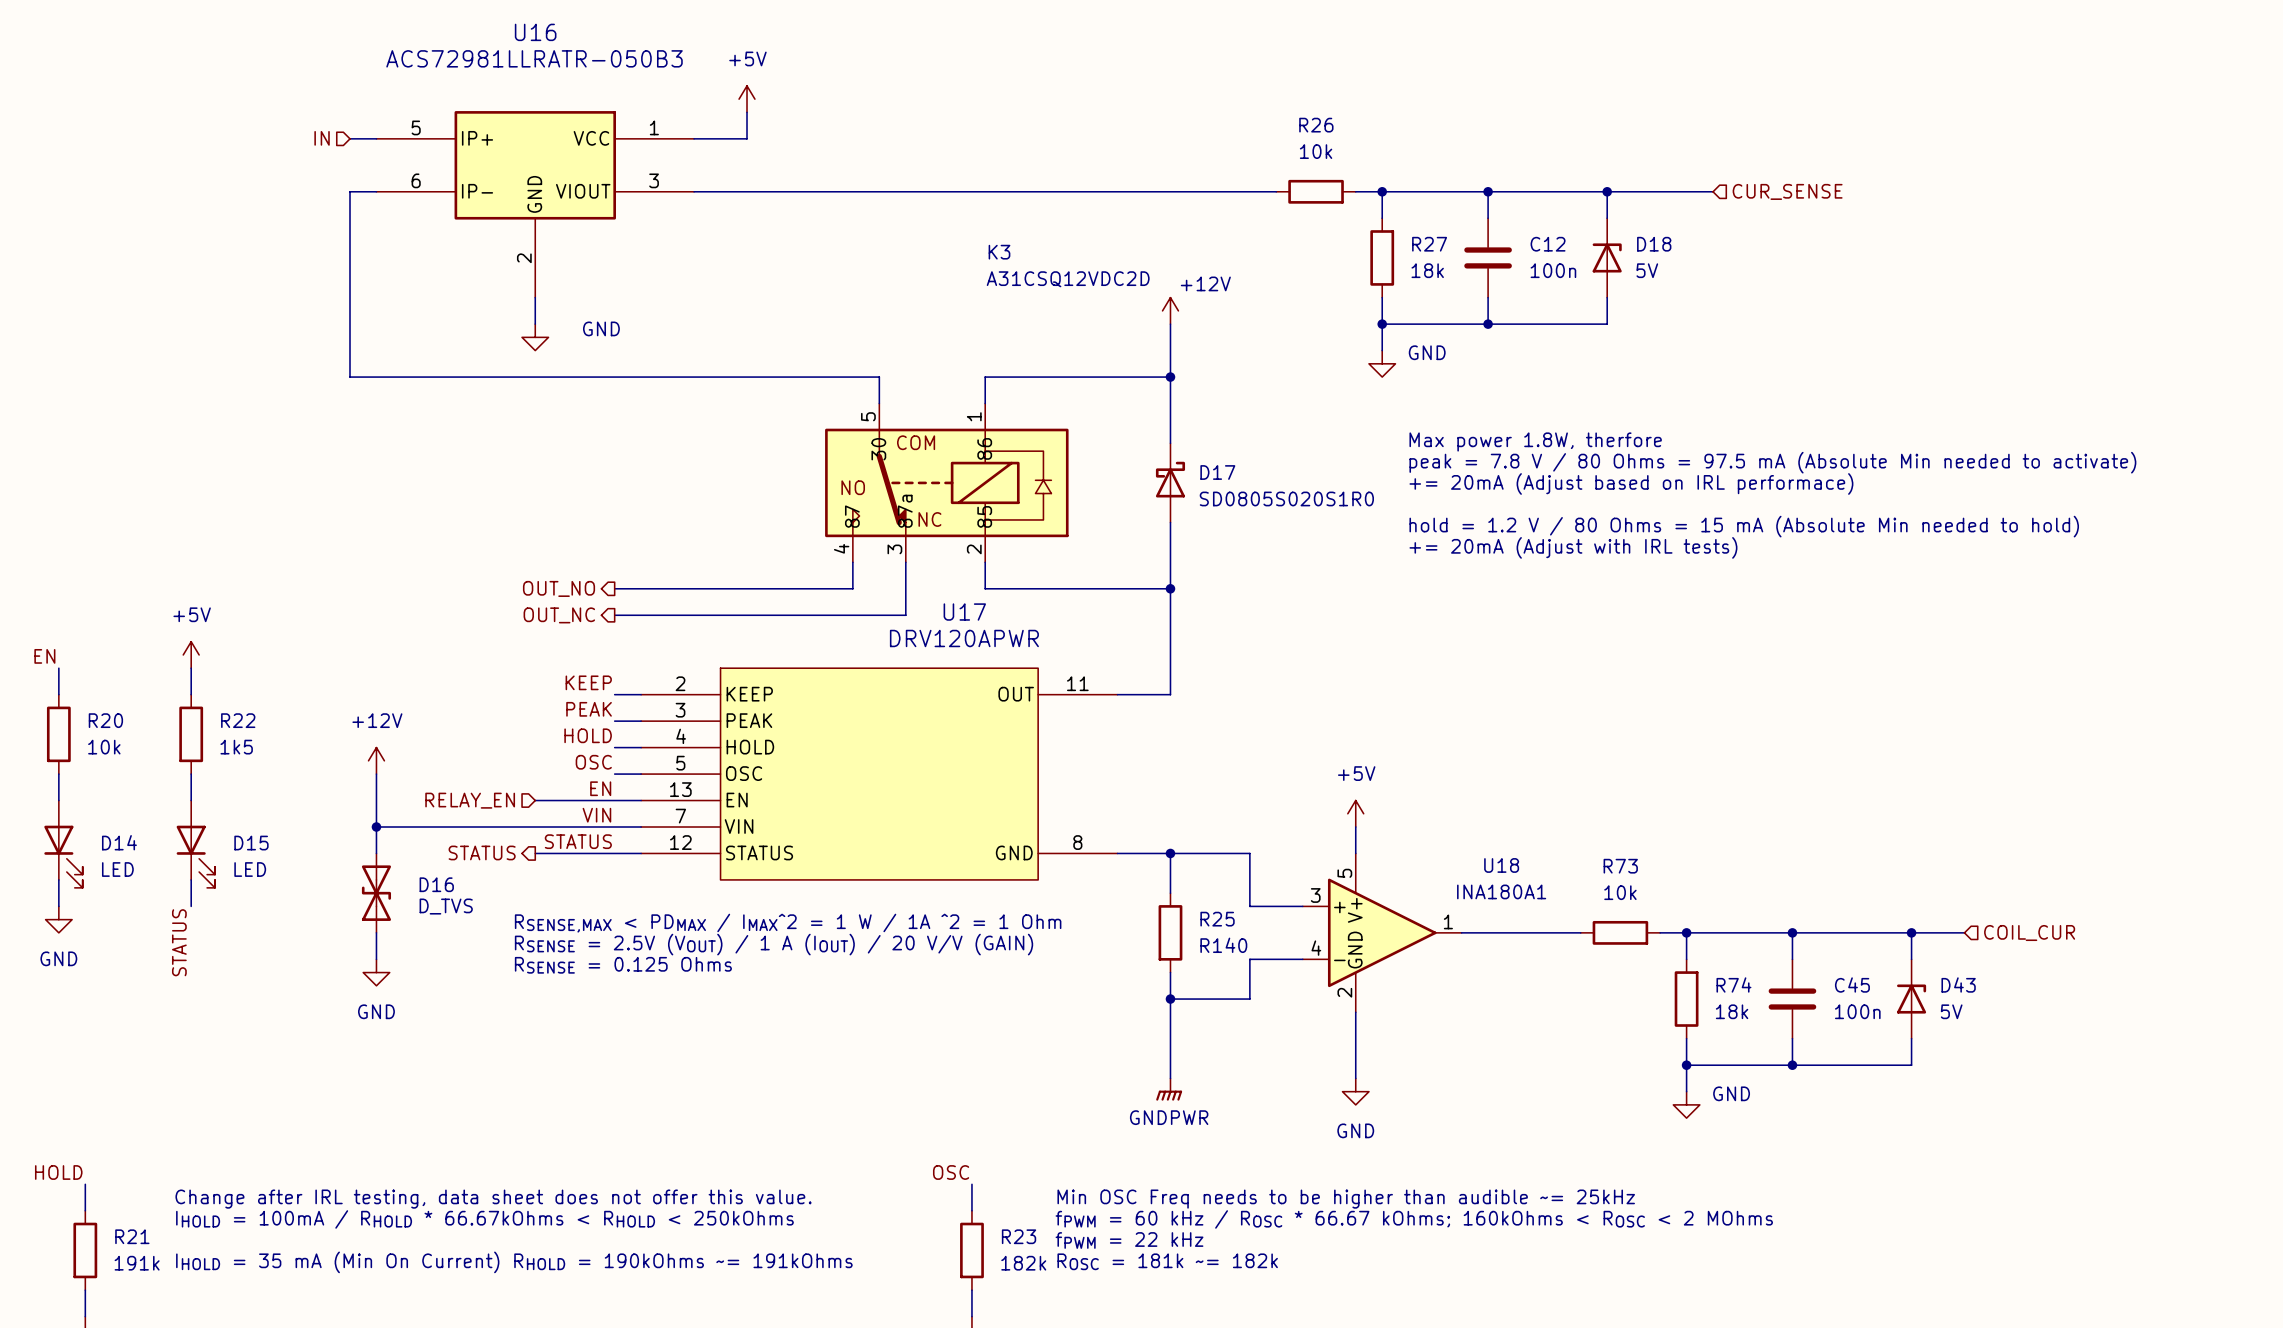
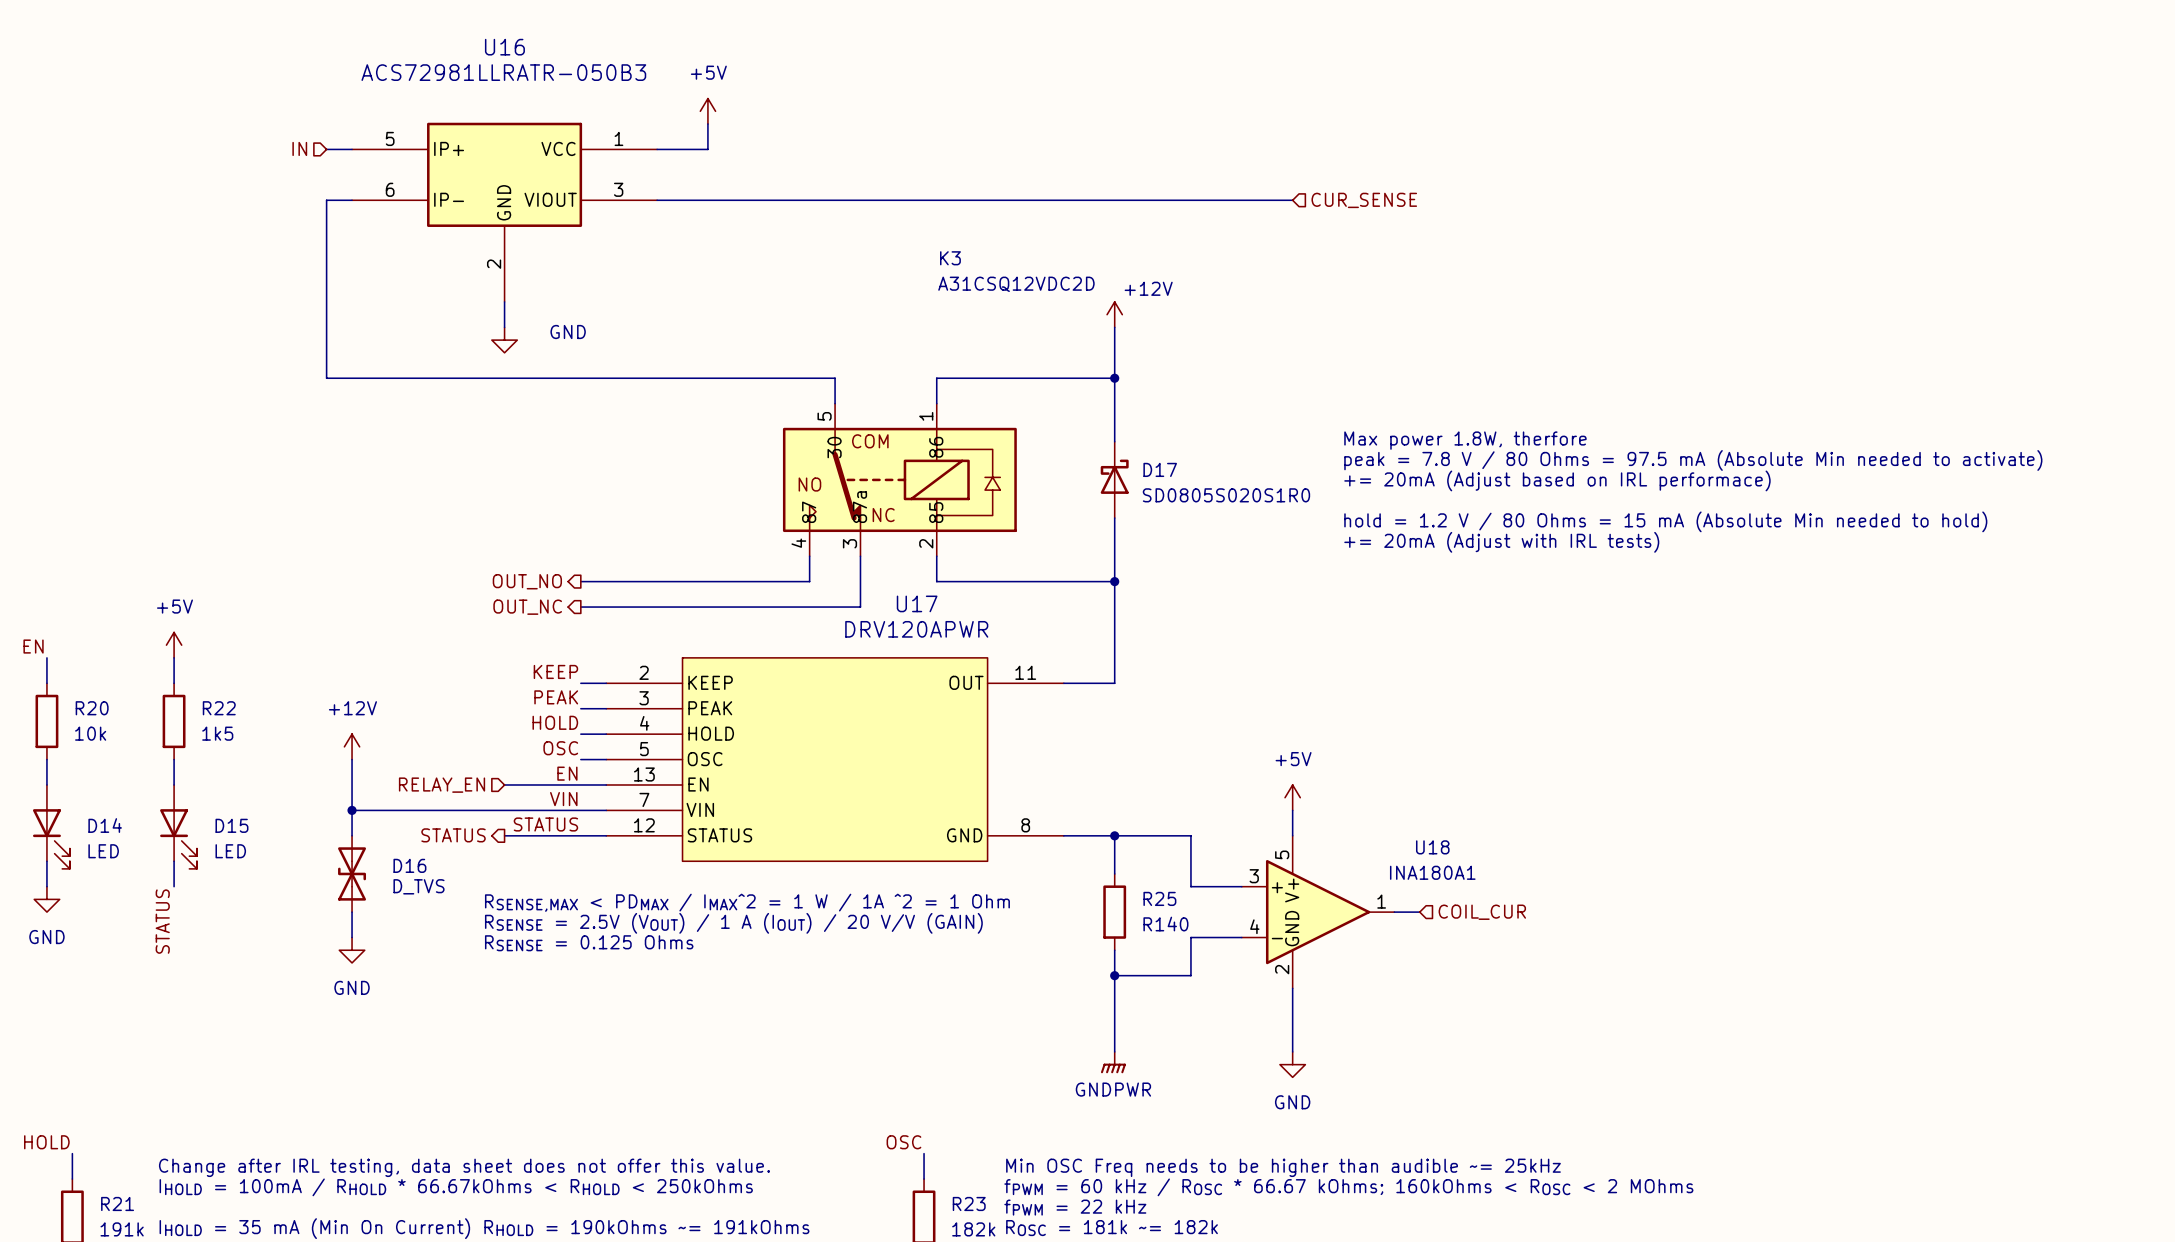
R26: 10k (1316, 191) -> none
wire: (1355, 191) (1713, 191) -> (1292, 200) (1216, 200)
wire: (1382, 191) (1382, 218) -> none
junction: (1382, 191) -> none
hierarchical label: none -> CUR_SENSE (1364, 200)
wire: (1488, 191) (1488, 218) -> none
junction: (1488, 191) -> none
wire: (1607, 191) (1607, 218) -> none
junction: (1607, 191) -> none
hierarchical label: CUR_SENSE (1787, 191) -> none
R27: 18k (1382, 257) -> none
C12: 100n (1488, 257) -> none
D18: 5V (1607, 257) -> none
wire: (1382, 297) (1382, 350) -> none
wire: (1488, 297) (1488, 324) -> none
wire: (1607, 297) (1607, 324) (1382, 324) -> none
junction: (1382, 324) -> none
junction: (1488, 324) -> none
power symbol: GND (1382, 363) -> none
wire: (1488, 932) (1580, 932) -> none
R73: 10k (1620, 932) -> none
wire: (1660, 932) (1964, 932) -> none
wire: (1686, 932) (1686, 959) -> none
junction: (1686, 932) -> none
wire: (1792, 932) (1792, 959) -> none
junction: (1792, 932) -> none
wire: (1911, 932) (1911, 959) -> none
junction: (1911, 932) -> none
hierarchical label: none -> COIL_CUR (1482, 912)
hierarchical label: COIL_CUR (2029, 933) -> none
R74: 18k (1686, 999) -> none
C45: 100n (1792, 999) -> none
D43: 5V (1911, 999) -> none
wire: (1686, 1038) (1686, 1091) -> none
wire: (1792, 1038) (1792, 1065) -> none
wire: (1911, 1038) (1911, 1065) (1686, 1065) -> none
junction: (1686, 1065) -> none
junction: (1792, 1065) -> none
power symbol: GND (1686, 1104) -> none

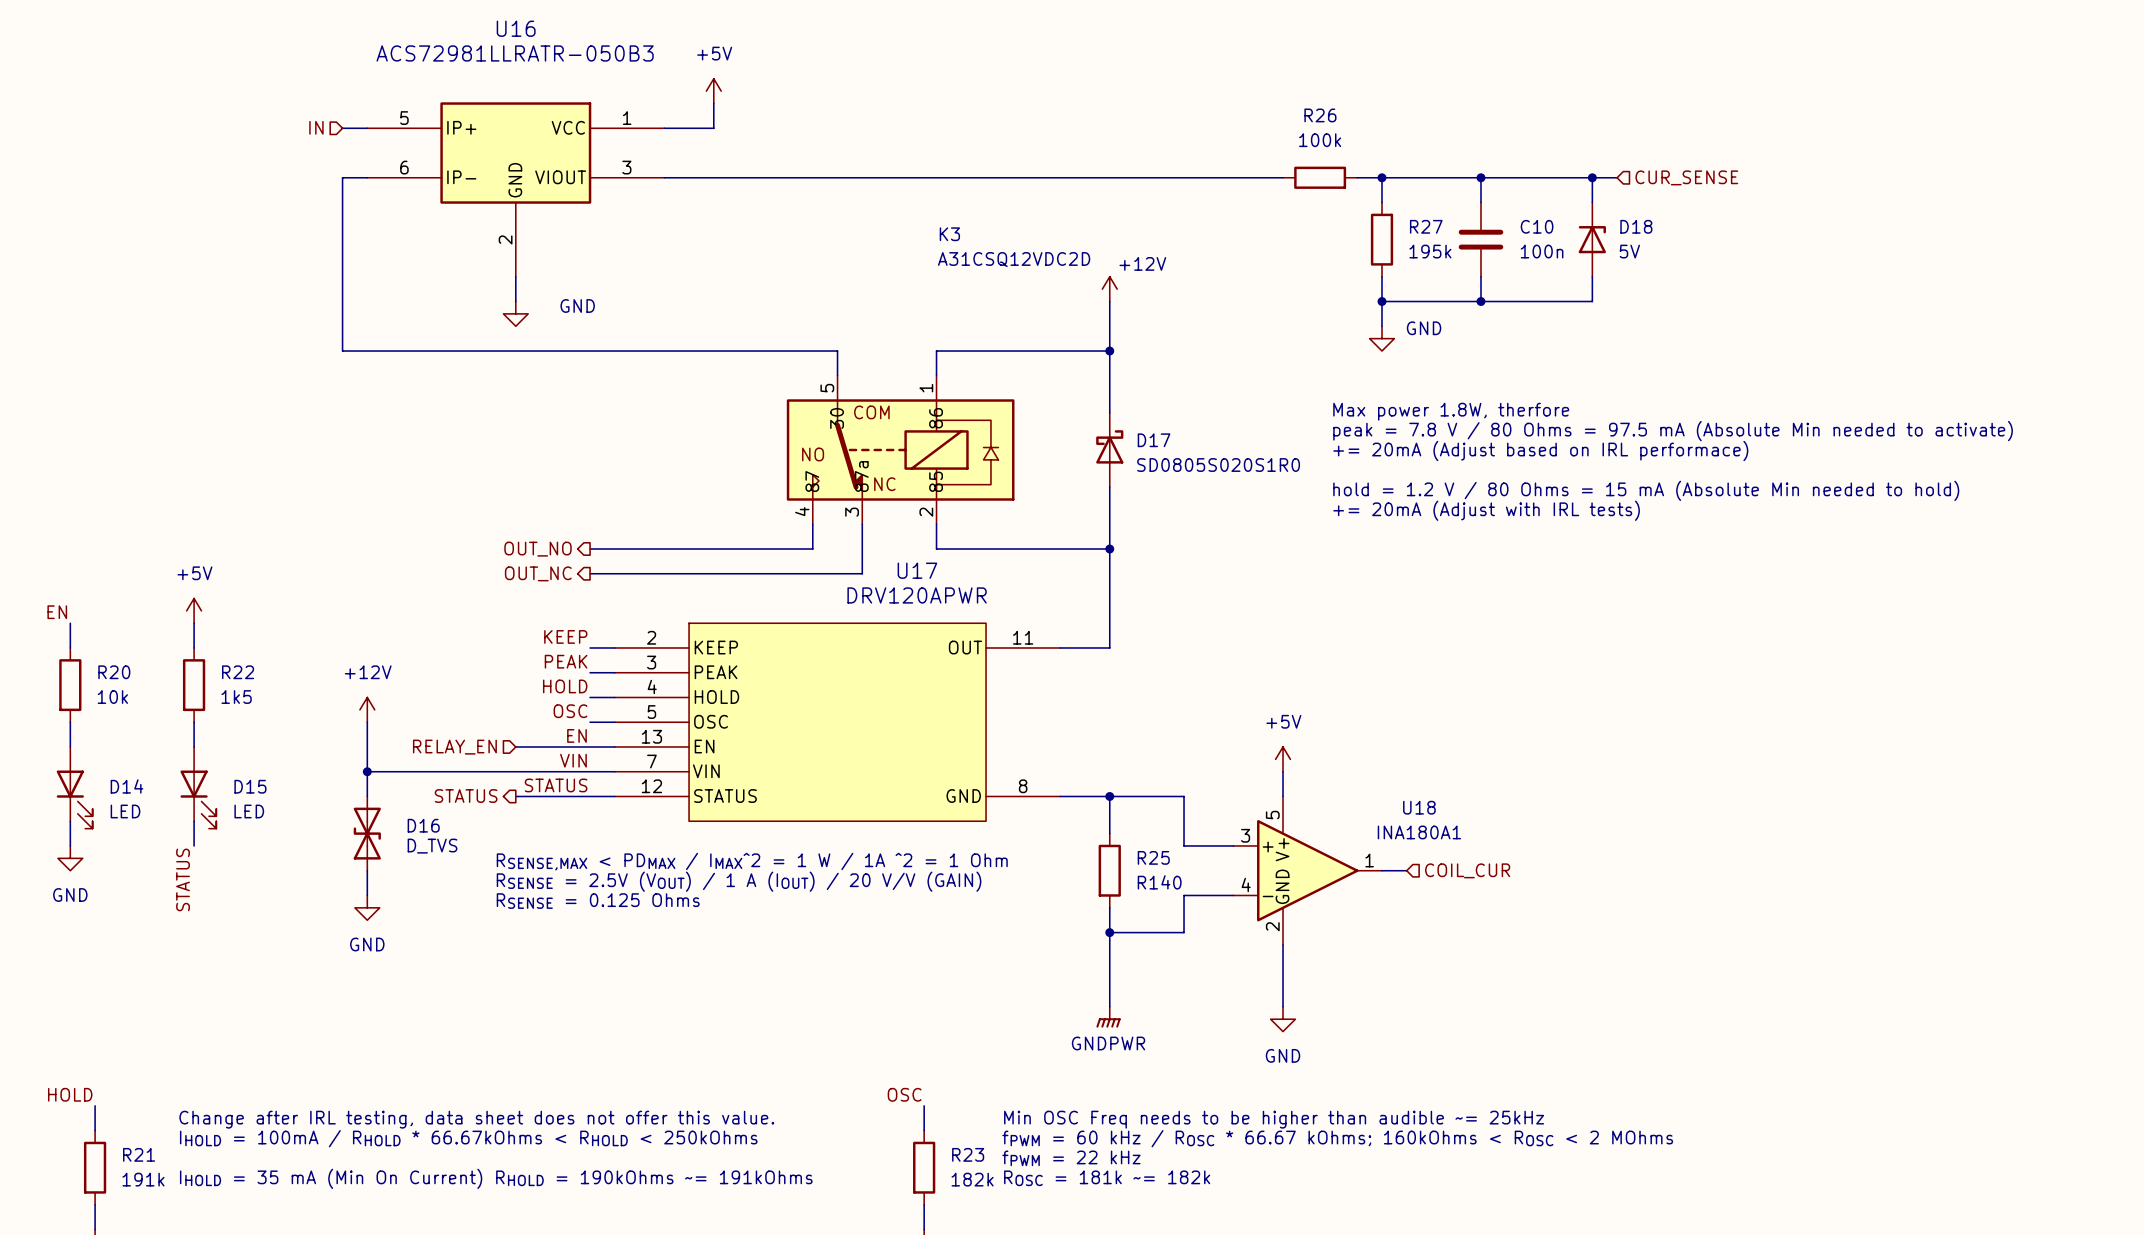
R26: none -> 100k (1320, 177)
hierarchical label: CUR_SENSE (1364, 200) -> none
wire: none -> (1357, 177) (1617, 177)
wire: none -> (1382, 177) (1382, 202)
junction: none -> (1382, 177)
wire: none -> (1480, 177) (1480, 202)
junction: none -> (1480, 177)
wire: none -> (1592, 177) (1592, 202)
junction: none -> (1592, 177)
hierarchical label: none -> CUR_SENSE (1686, 177)
R27: none -> 195k (1382, 239)
C10: none -> 100n (1480, 239)
D18: none -> 5V (1592, 239)
wire: none -> (1382, 276) (1382, 326)
wire: none -> (1480, 276) (1480, 301)
wire: none -> (1592, 276) (1592, 301) (1382, 301)
junction: none -> (1382, 301)
junction: none -> (1480, 301)
power symbol: none -> GND (1382, 338)

